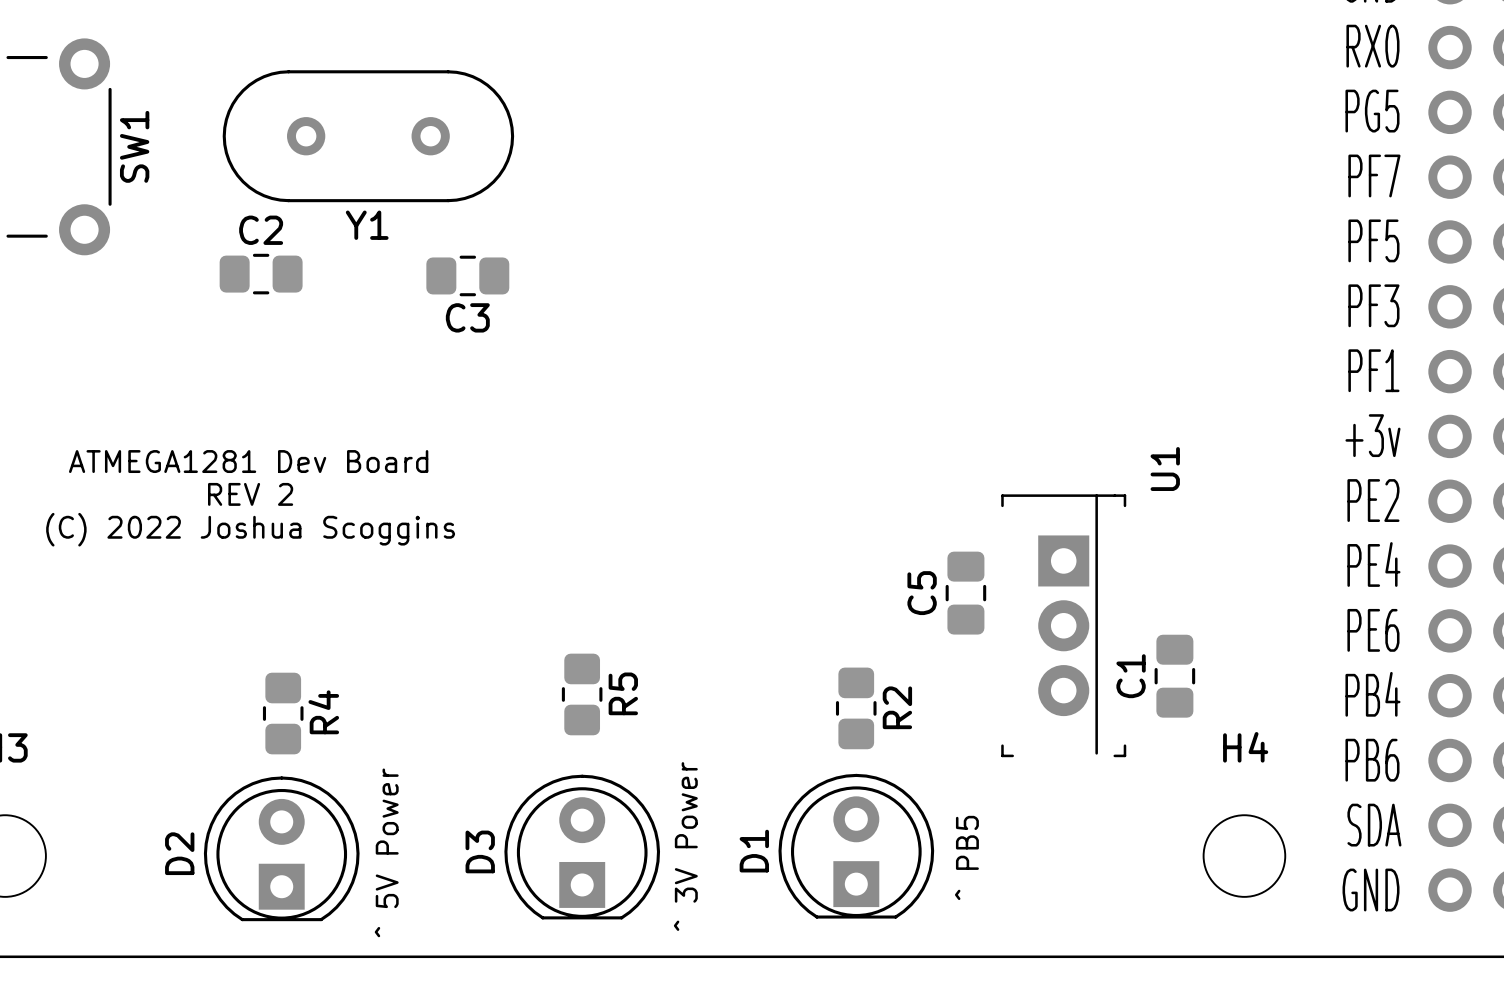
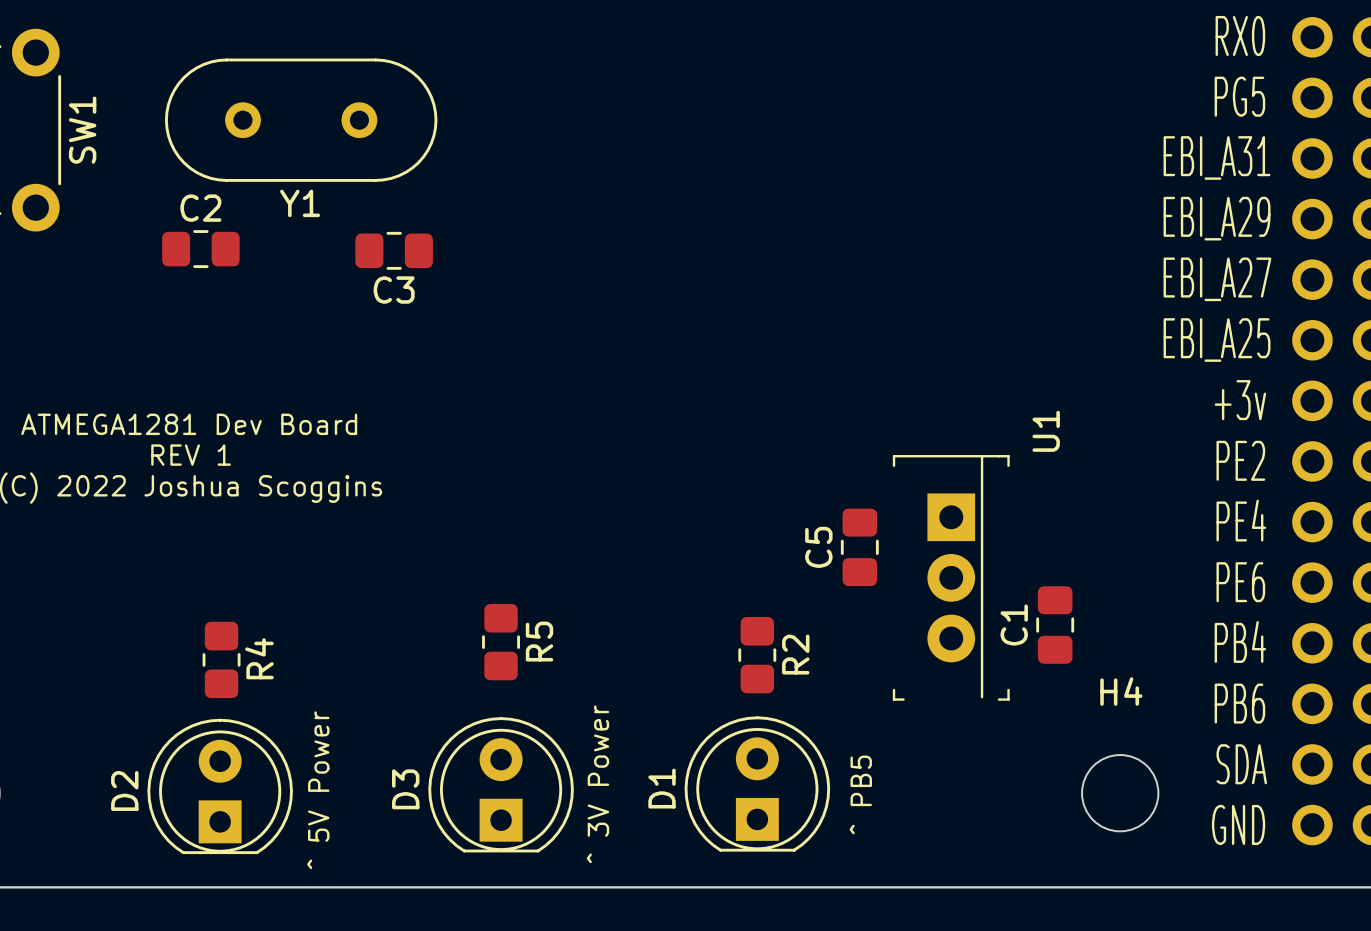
text: PF7 (1374, 175) -> EBI_A31 (1217, 157)
text: PF5 (1373, 240) -> EBI_A29 (1217, 218)
text: PF3 (1373, 305) -> EBI_A27 (1217, 279)
text: PF1 (1373, 370) -> EBI_A25 (1217, 340)
text: REV 2 (250, 494) -> REV 1 (191, 455)

